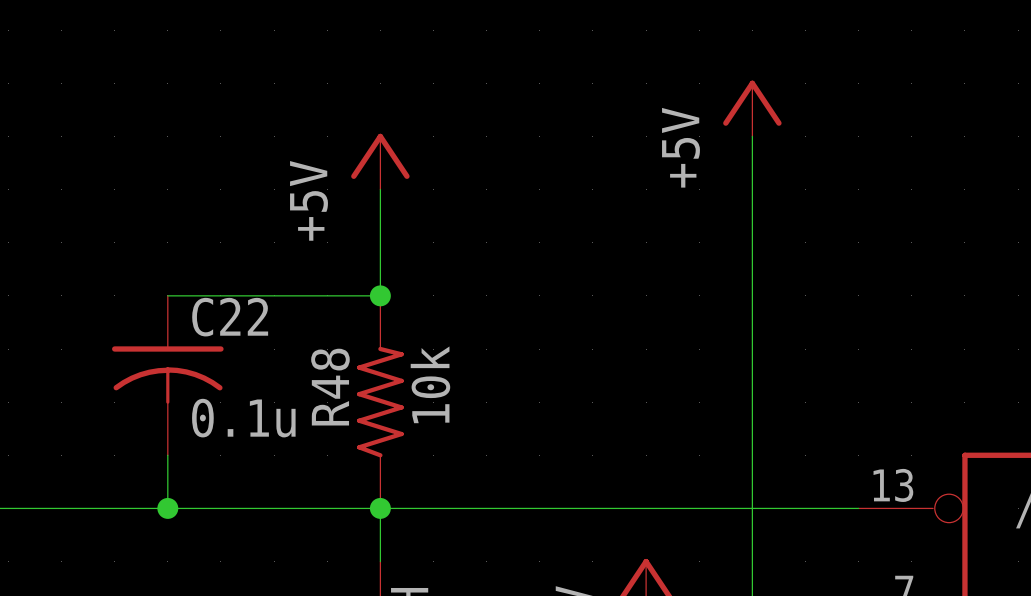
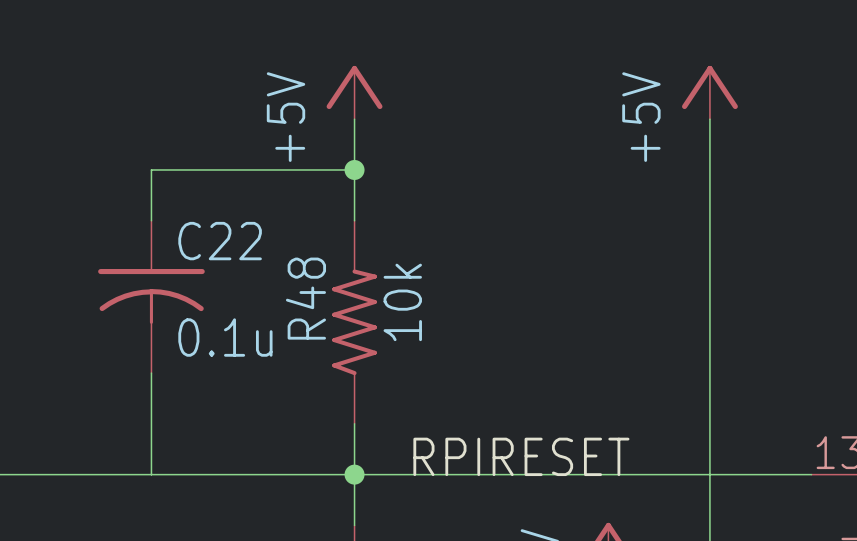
wire: none -> (354, 119) (354, 169) (151, 169) (151, 220)
power symbol position: +5V (380, 161) -> +5V (354, 92)
wire: (380, 242) (380, 295) (167, 295) -> none
junction position: (380, 295) -> (354, 169)
C22 position: (167, 375) -> (151, 296)
R48 position: (380, 402) -> (354, 322)
label: none -> RPIRESET (521, 456)
junction: (167, 508) -> none

